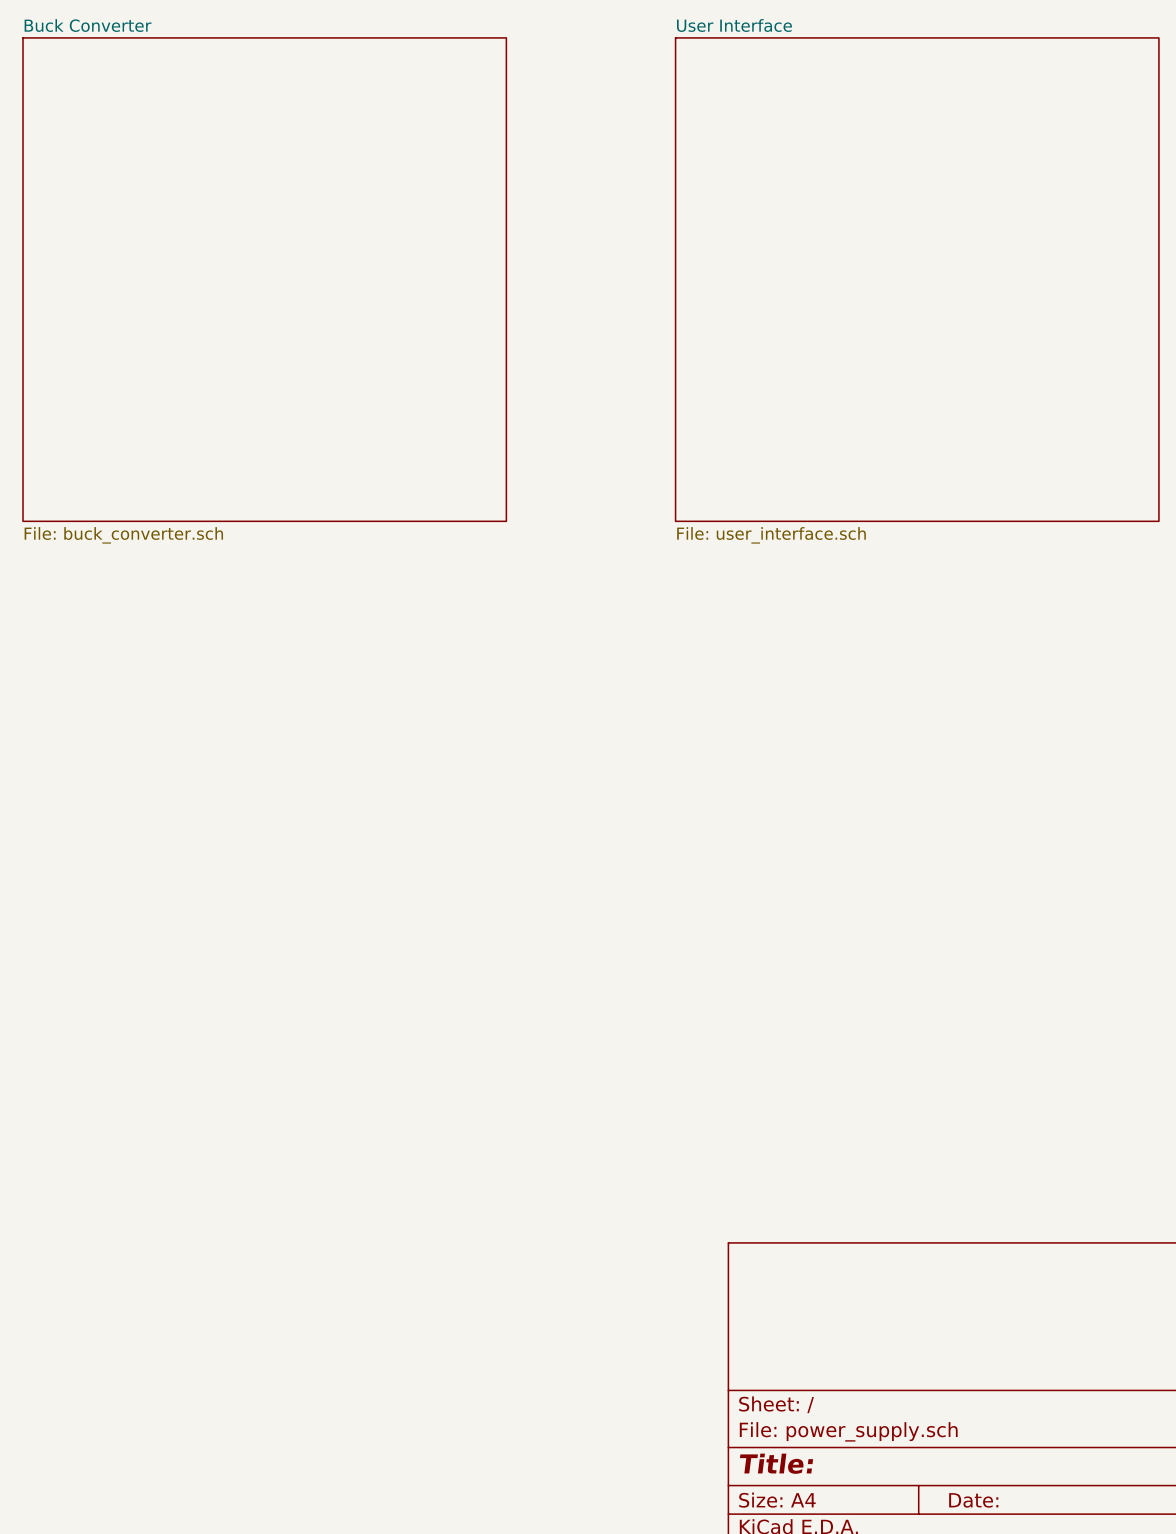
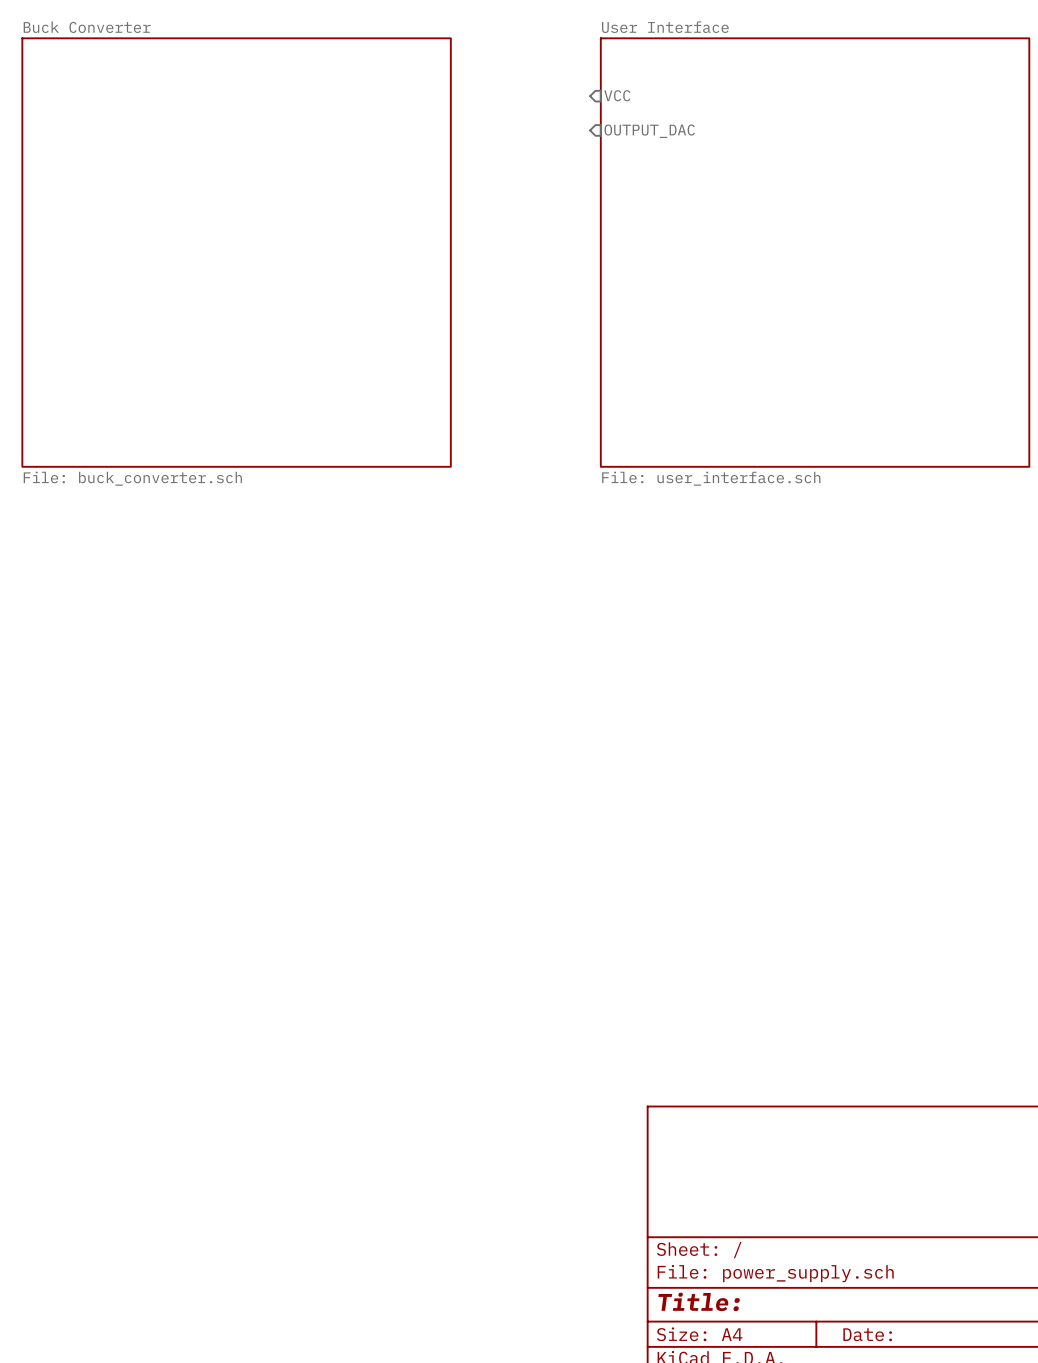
hierarchical label: none -> VCC (617, 95)
hierarchical label: none -> OUTPUT_DAC (649, 131)

